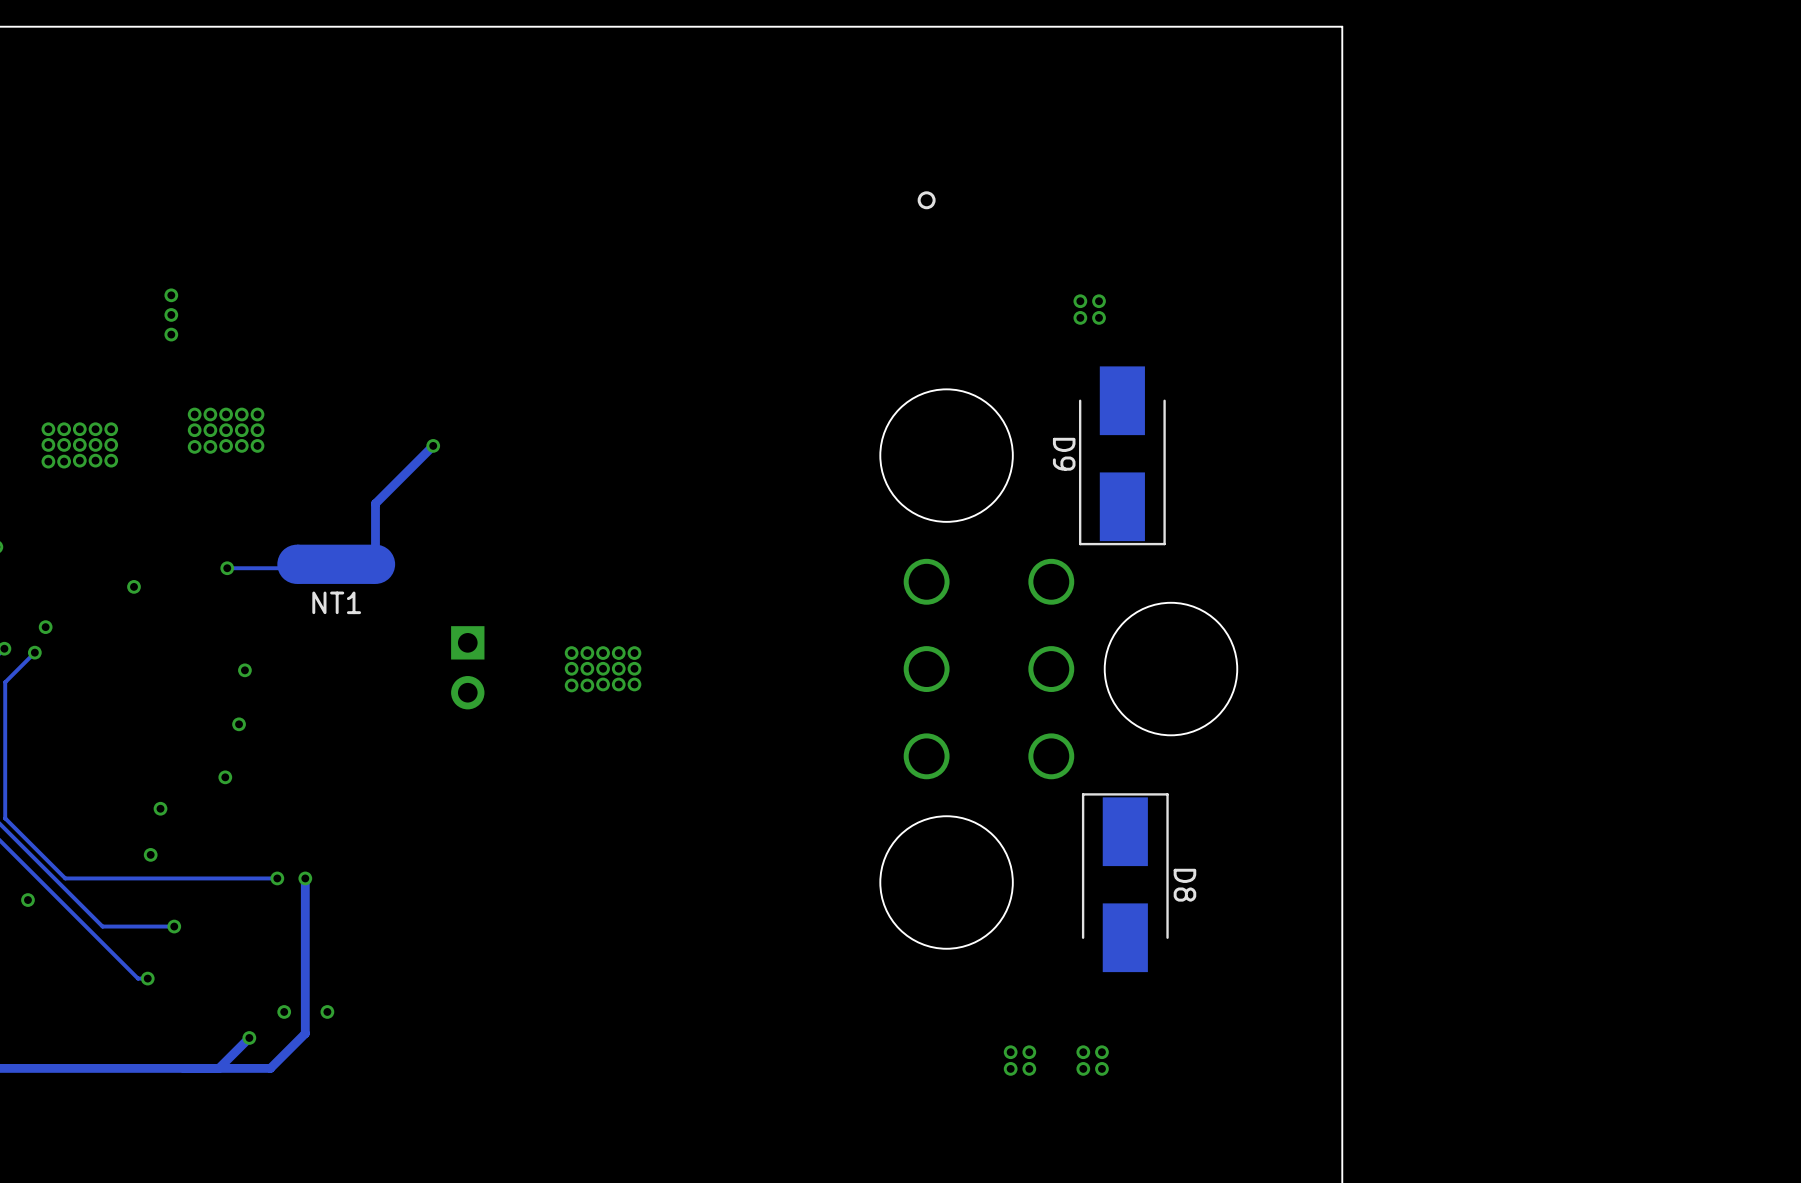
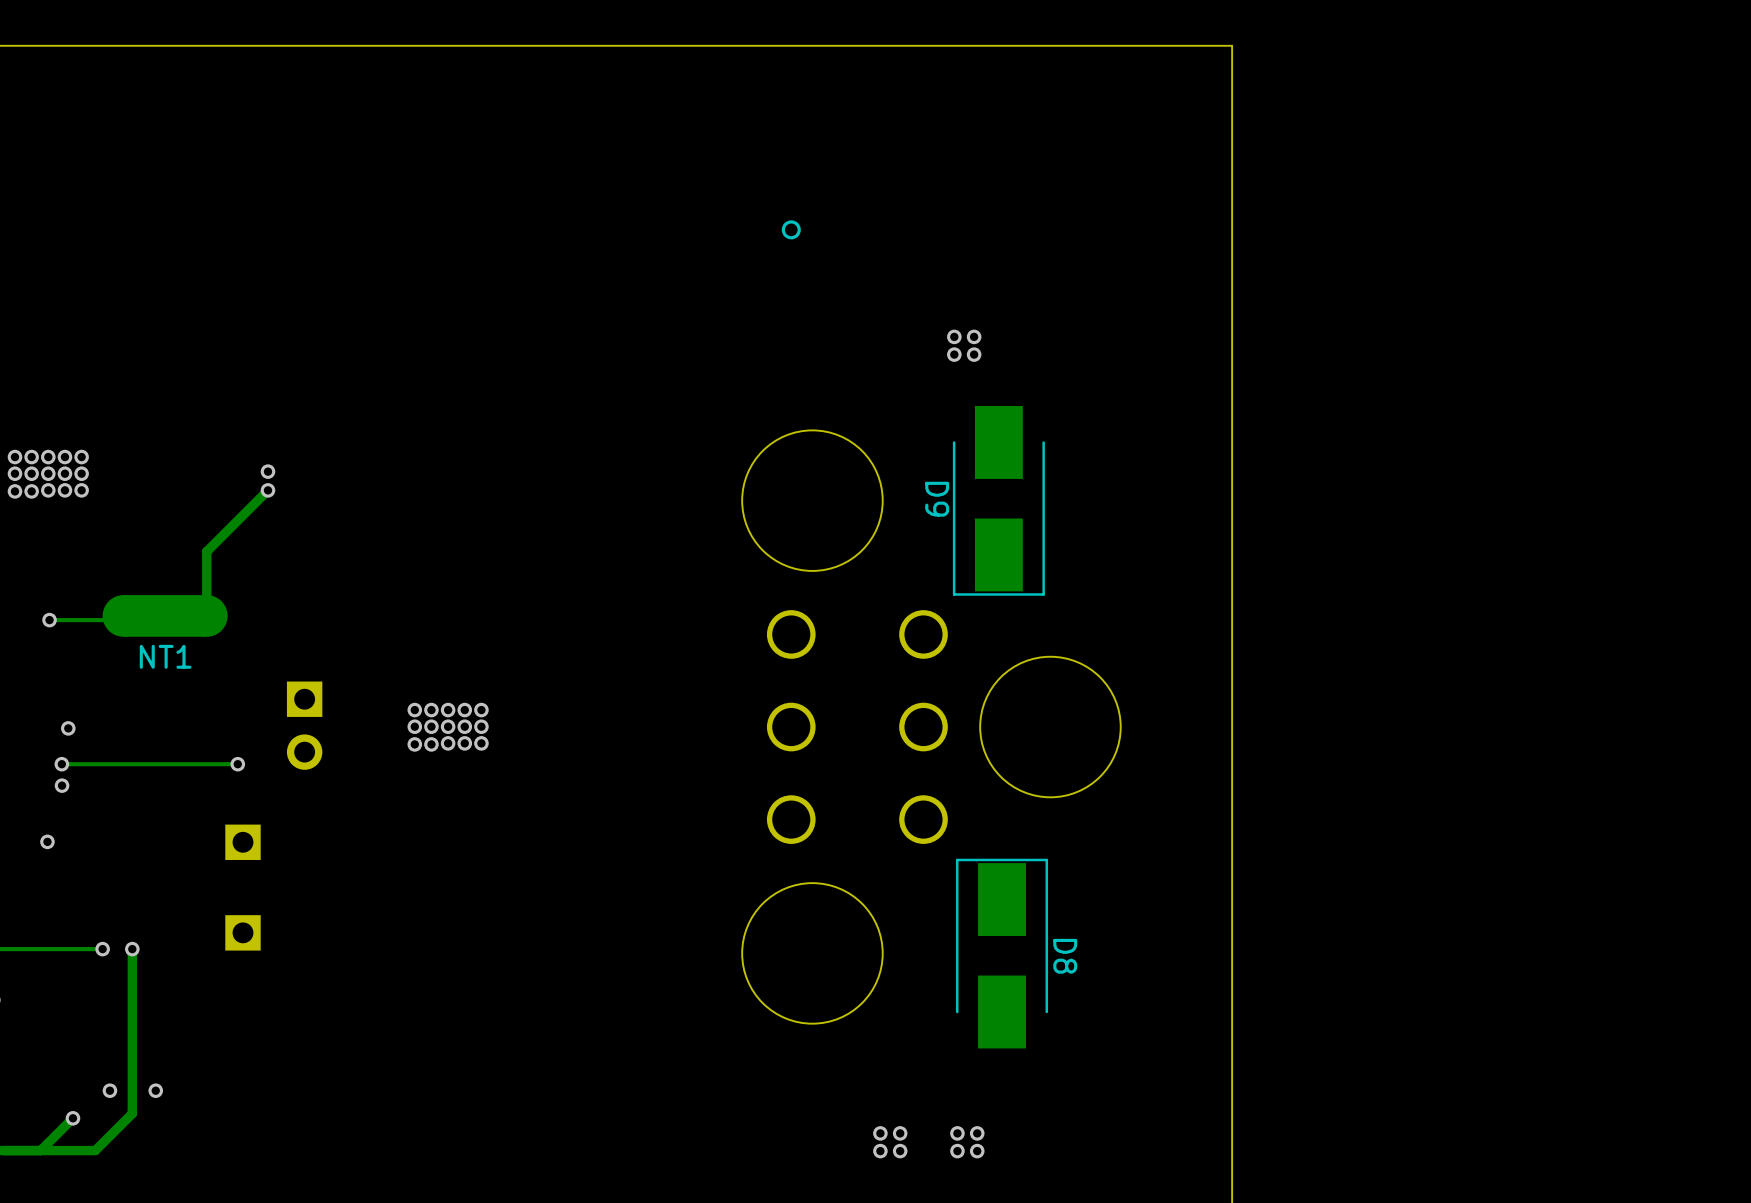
via: none -> (267, 471)
via: none -> (61, 764)
track: none -> (237, 764) (61, 764)
via: none -> (237, 764)
part: none -> (243, 842)
part: none -> (243, 932)

